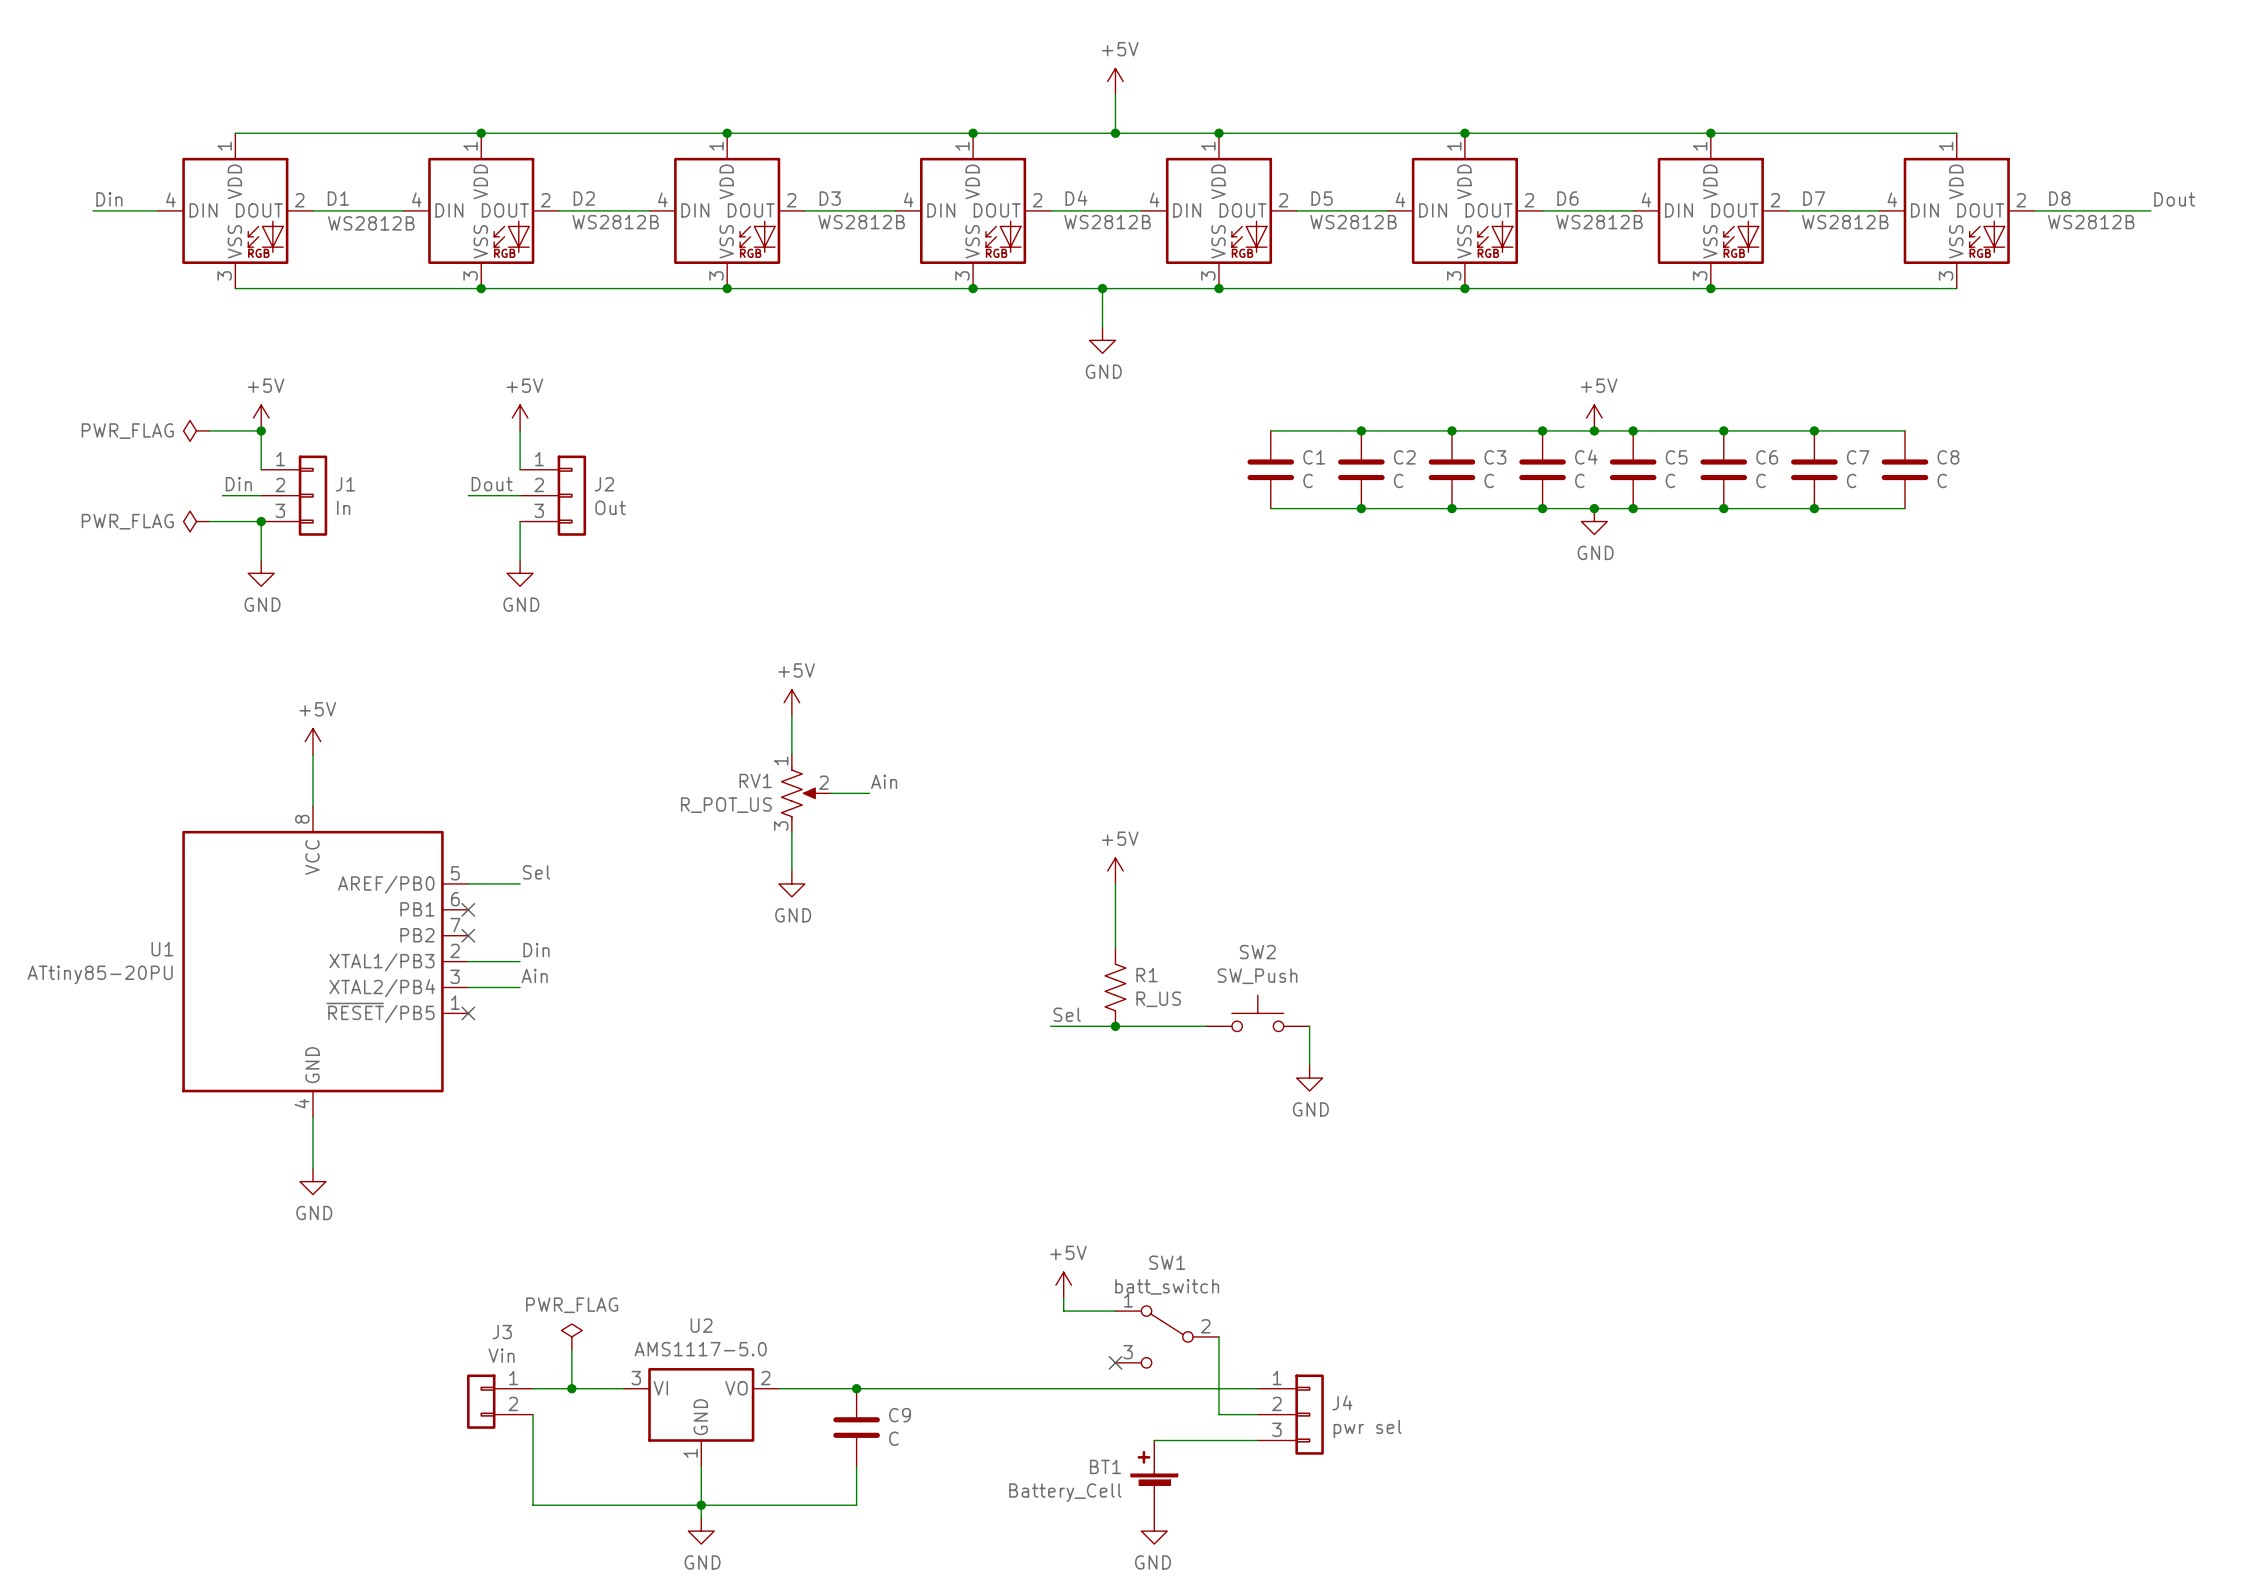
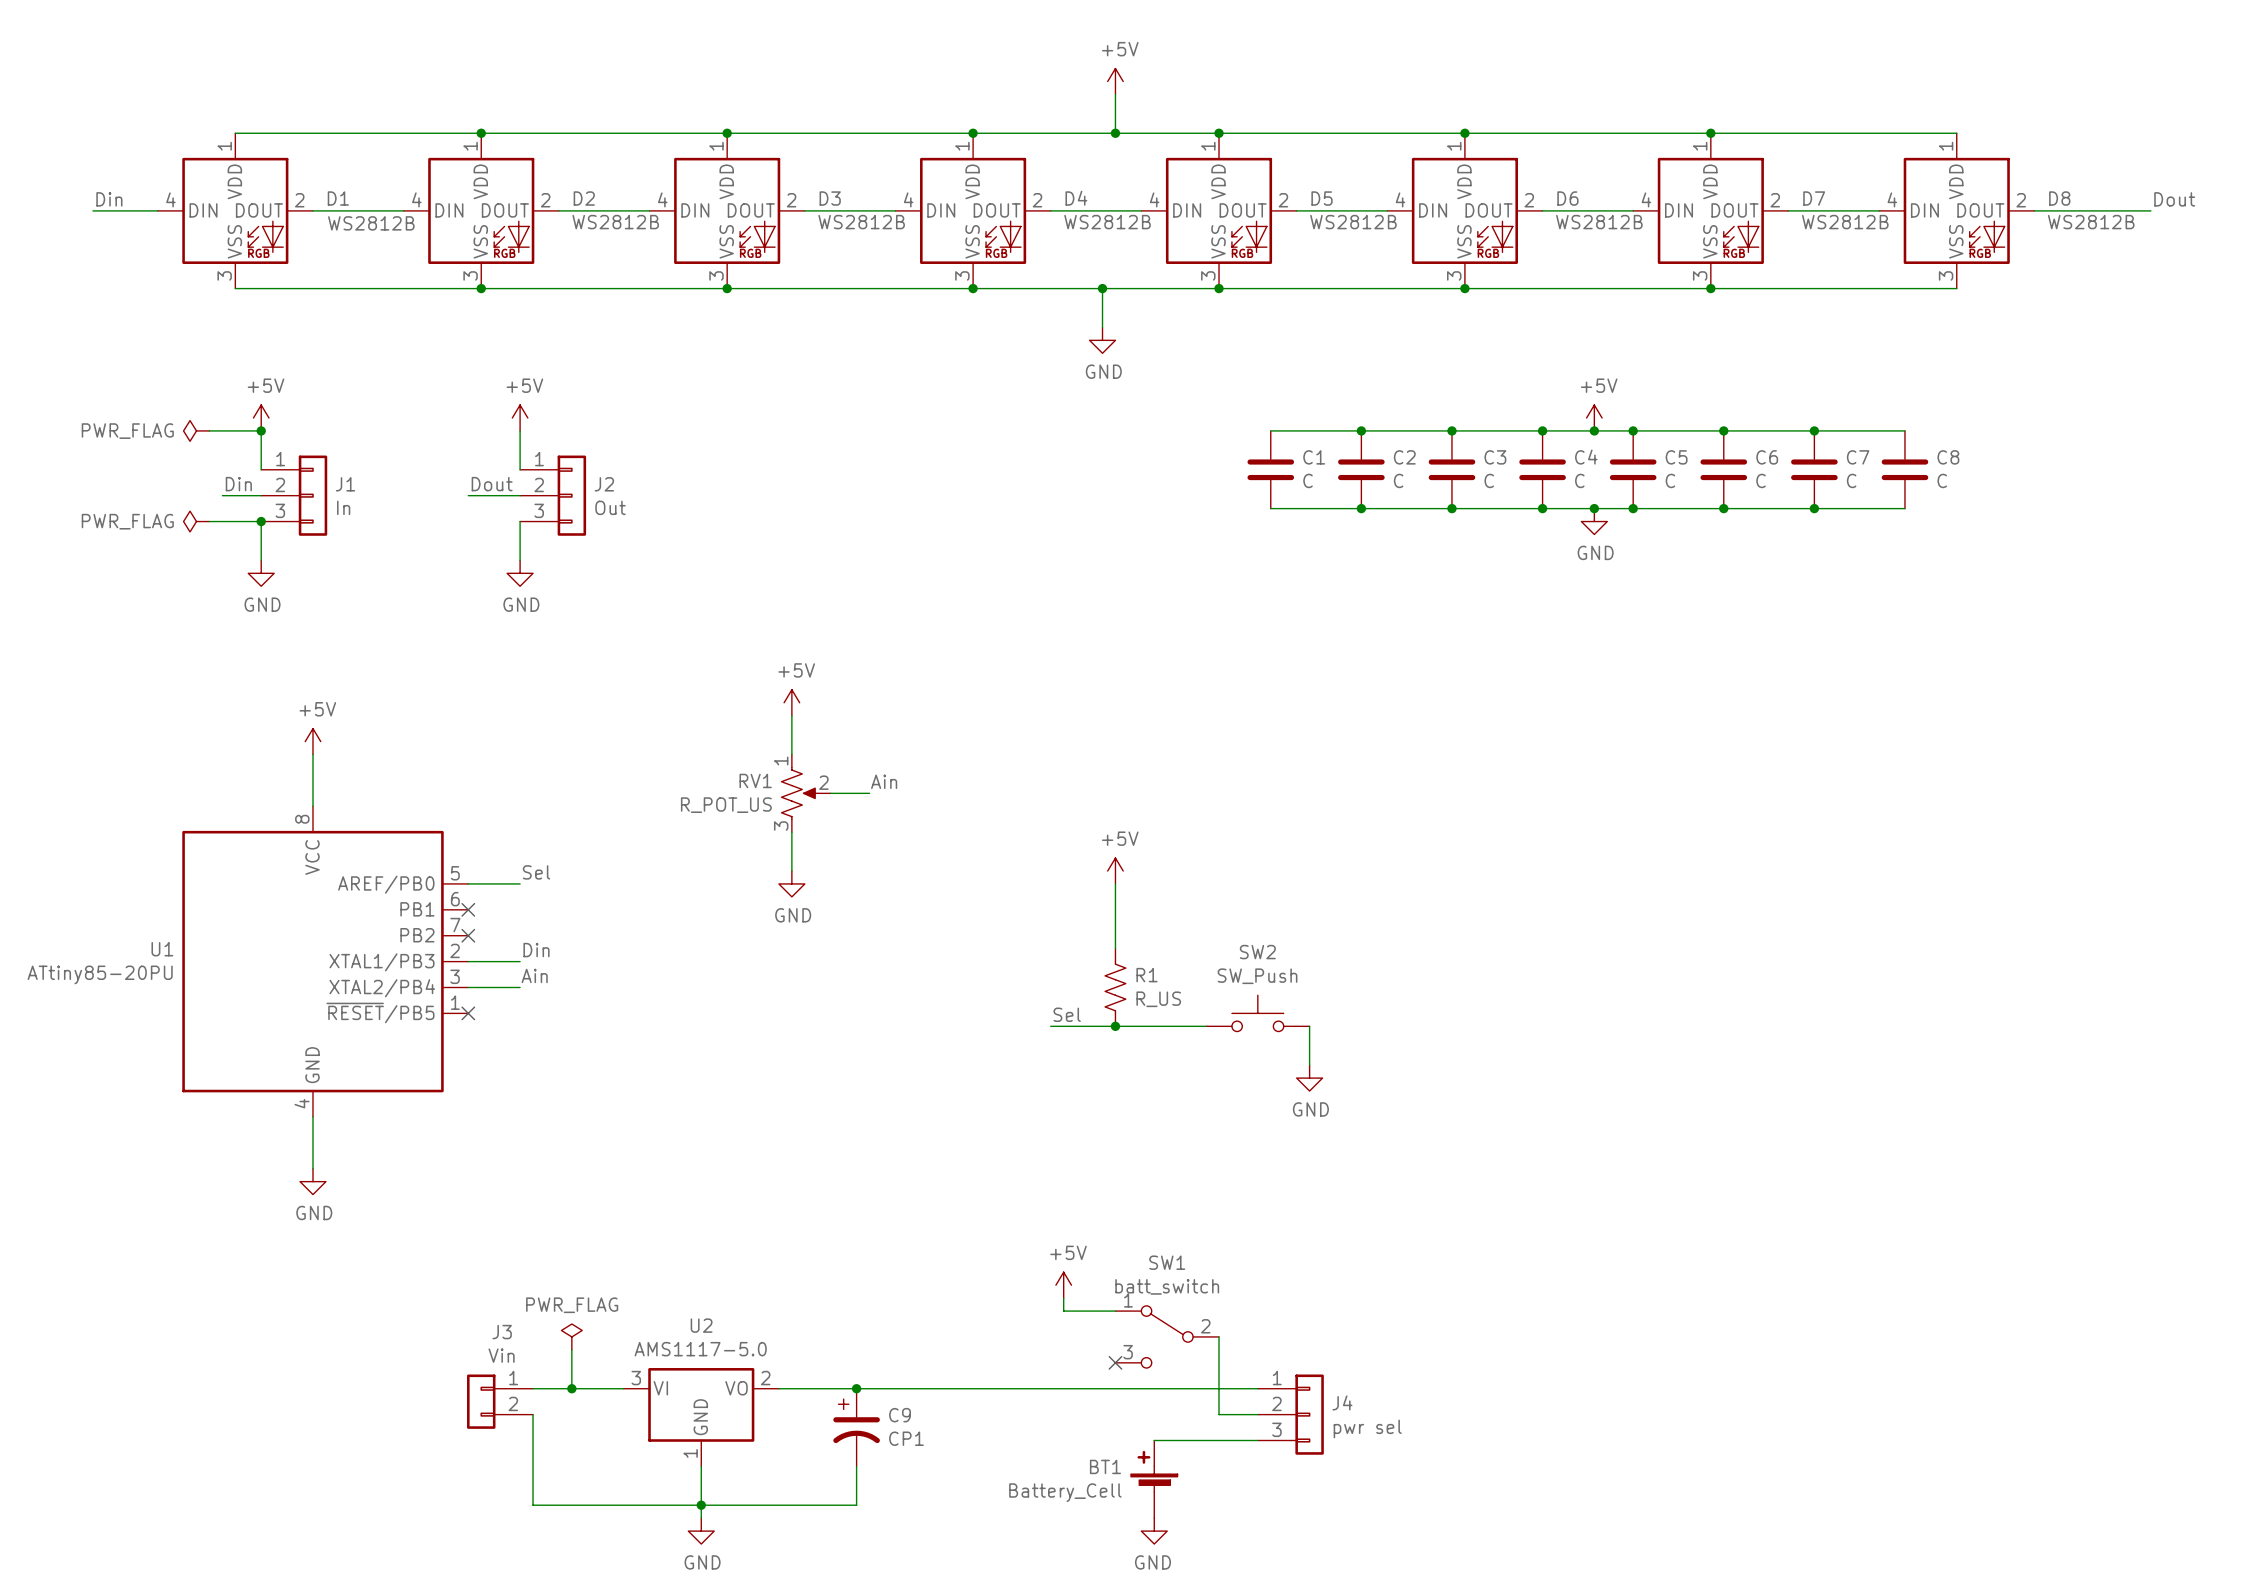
C9 symbol: [833, 1388, 880, 1467] -> [833, 1388, 880, 1467]
C9 value: C (893, 1438) -> CP1 (906, 1438)

